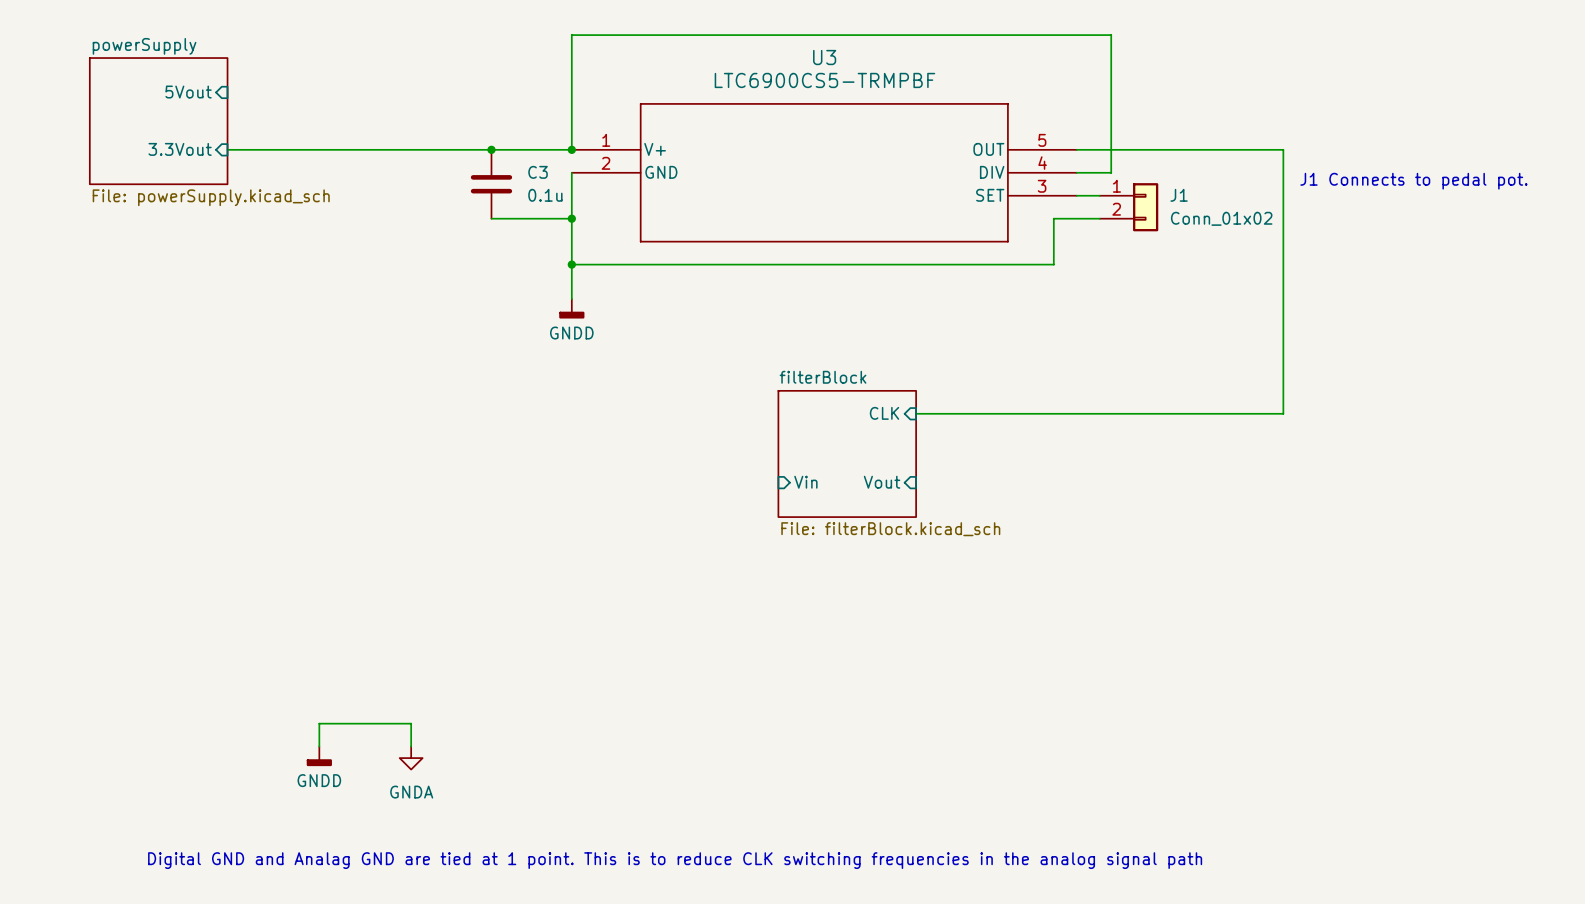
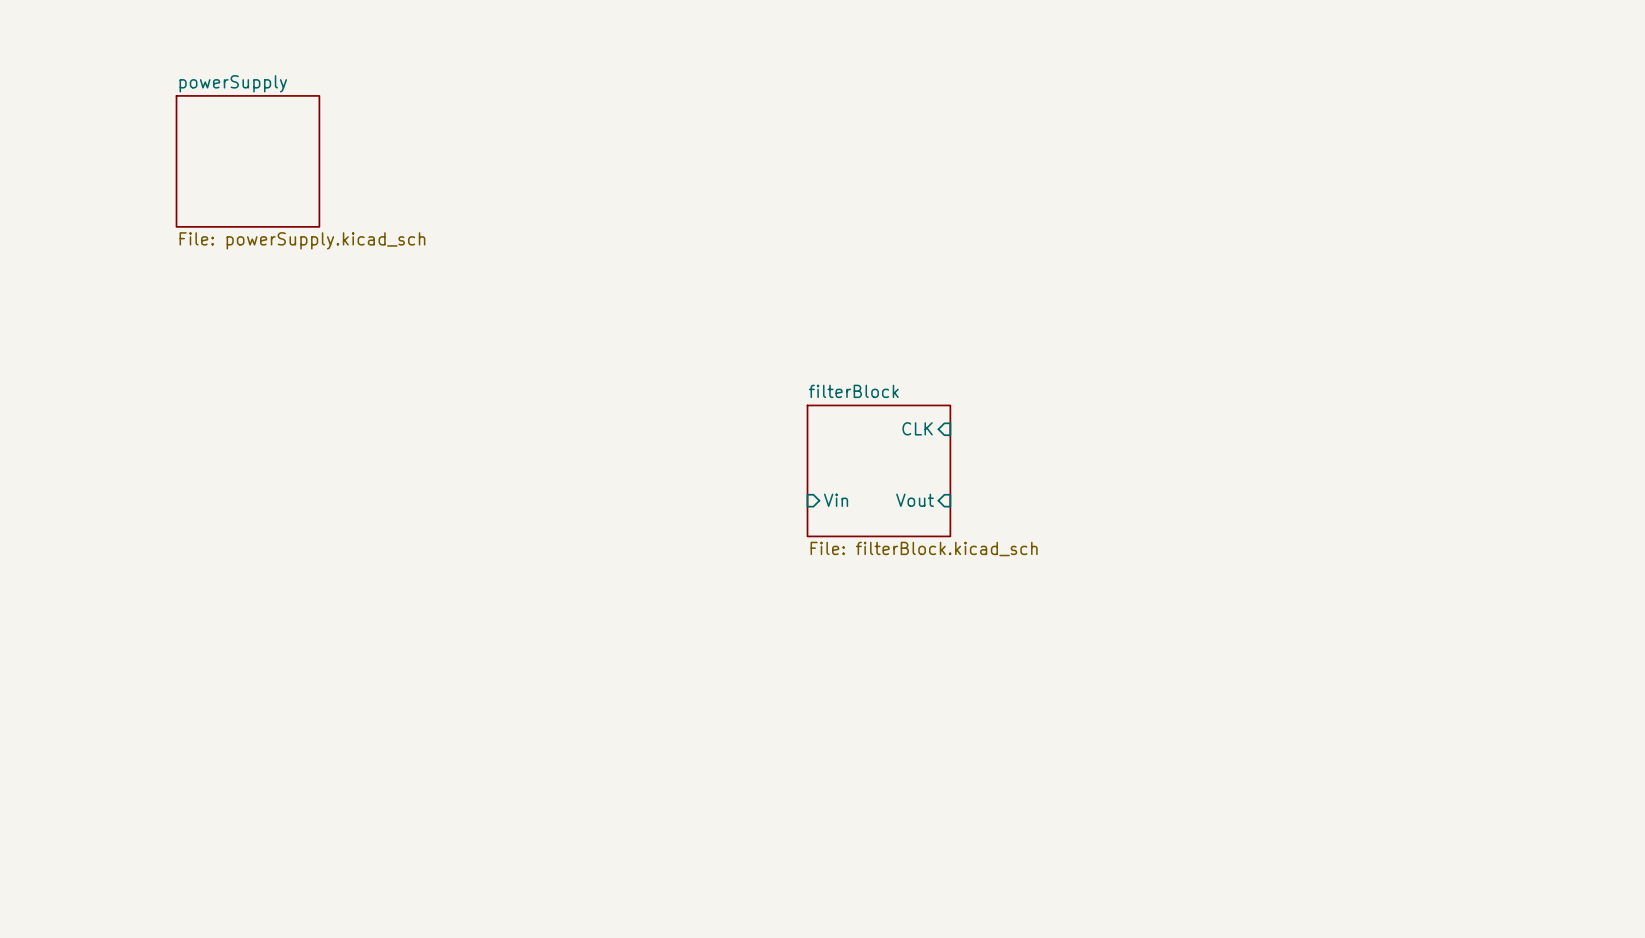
sheet pin: 5Vout (188, 92) -> none
sheet powerSupply position: (158, 121) -> (247, 161)
sheet pin: 3.3Vout (180, 149) -> none
wire: (227, 149) (571, 149) (571, 35) (1111, 35) (1111, 172) (1076, 172) -> none
junction: (491, 149) -> none
junction: (571, 149) -> none
wire: (1076, 149) (1283, 149) (1283, 413) (916, 413) -> none
wire: (571, 172) (571, 299) -> none
U3: LTC6900CS5-TRMPBF (824, 172) -> none
text: J1 Connects to pedal pot. (1413, 181) -> none
C3: 0.1u (491, 184) -> none
wire: (1076, 195) (1099, 195) -> none
J1: Conn_01x02 (1129, 207) -> none
wire: (491, 218) (571, 218) -> none
junction: (571, 218) -> none
wire: (1099, 218) (1053, 218) (1053, 264) (571, 264) -> none
junction: (571, 264) -> none
power symbol: GNDD (571, 308) -> none
wire: (319, 746) (319, 723) (411, 723) (411, 746) -> none
power symbol: GNDD (319, 756) -> none
power symbol: GNDA (411, 758) -> none
text: Digital GND and Analag GND are tied at 1 point. This is to reduce CLK switching frequencies in the analog signal path (675, 860) -> none

